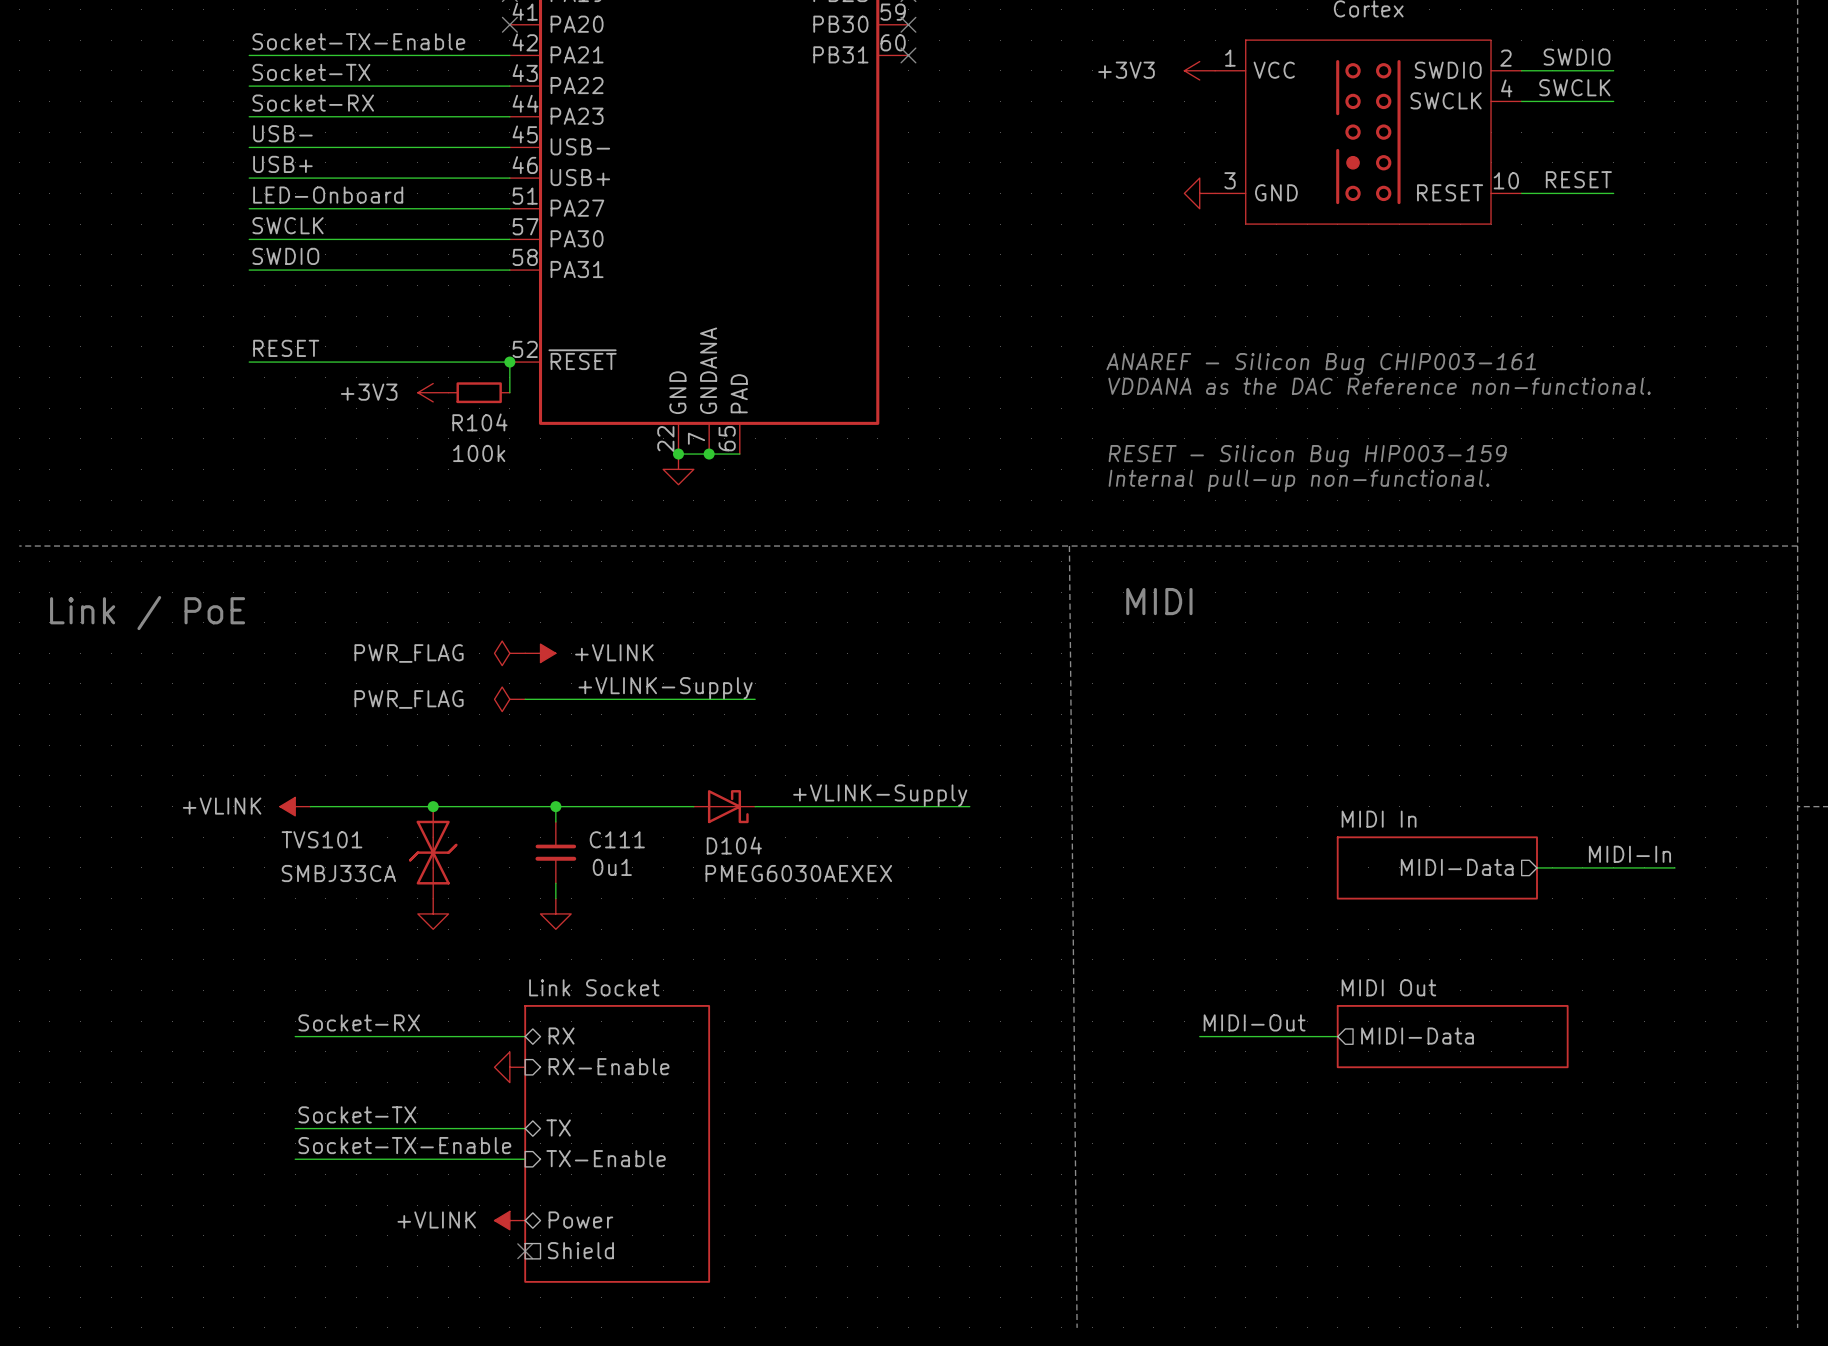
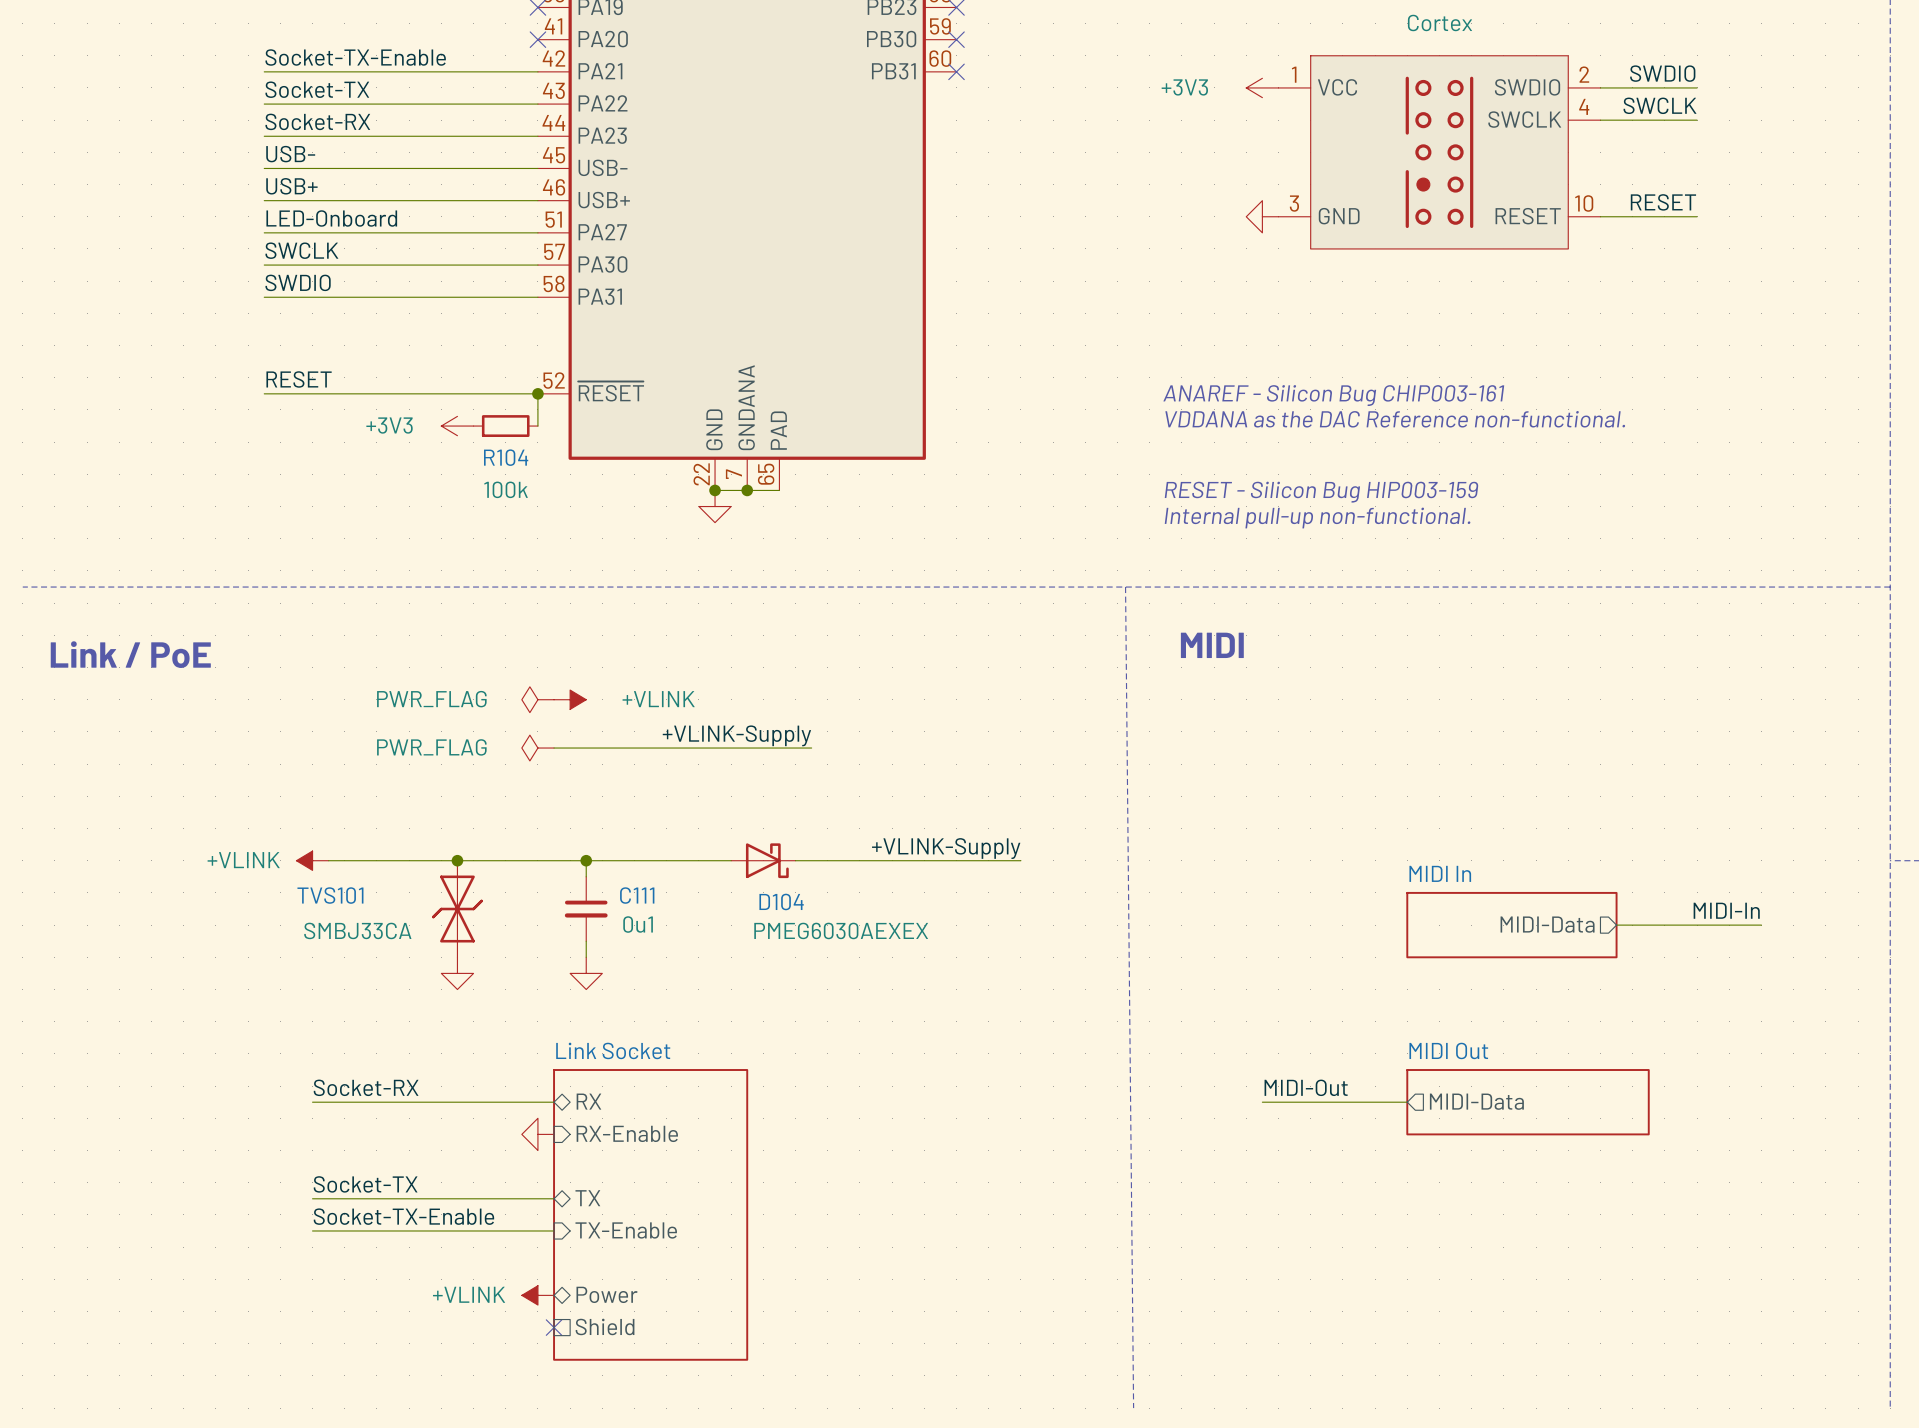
power symbol text position: +VLINK (614, 652) -> +VLINK (658, 699)
label position: +VLINK-Supply (665, 688) -> +VLINK-Supply (736, 735)
wire: none -> (795, 748) (811, 748)

